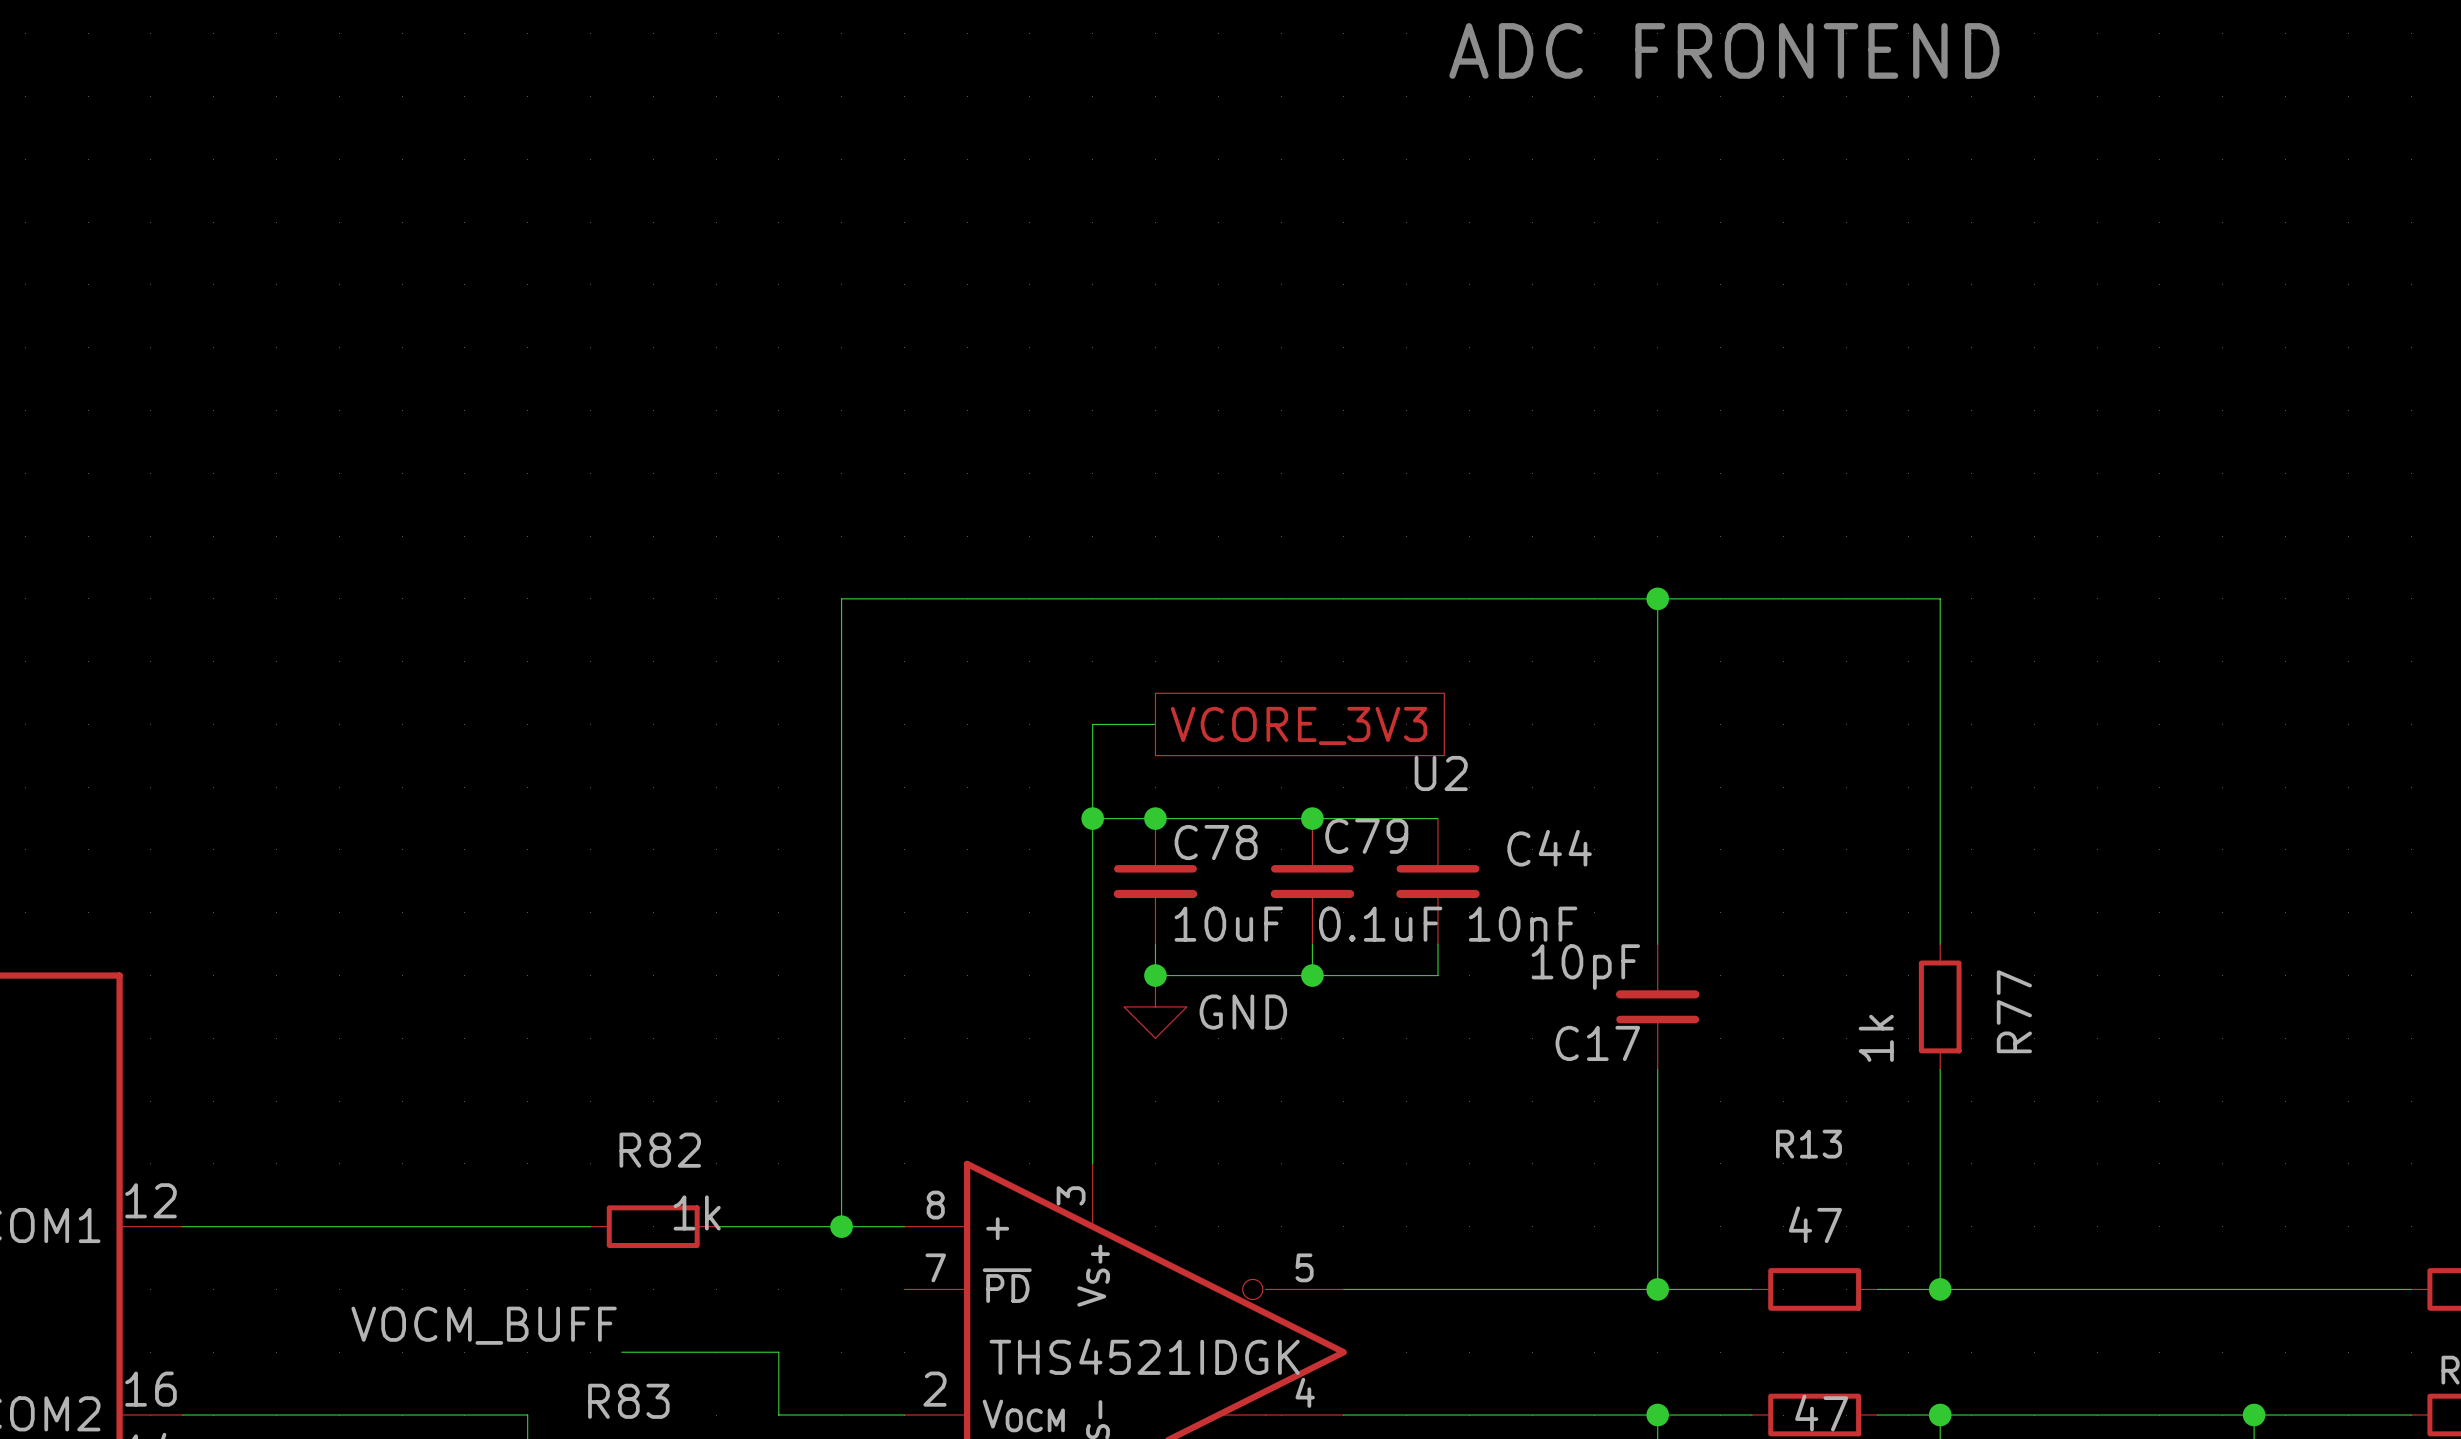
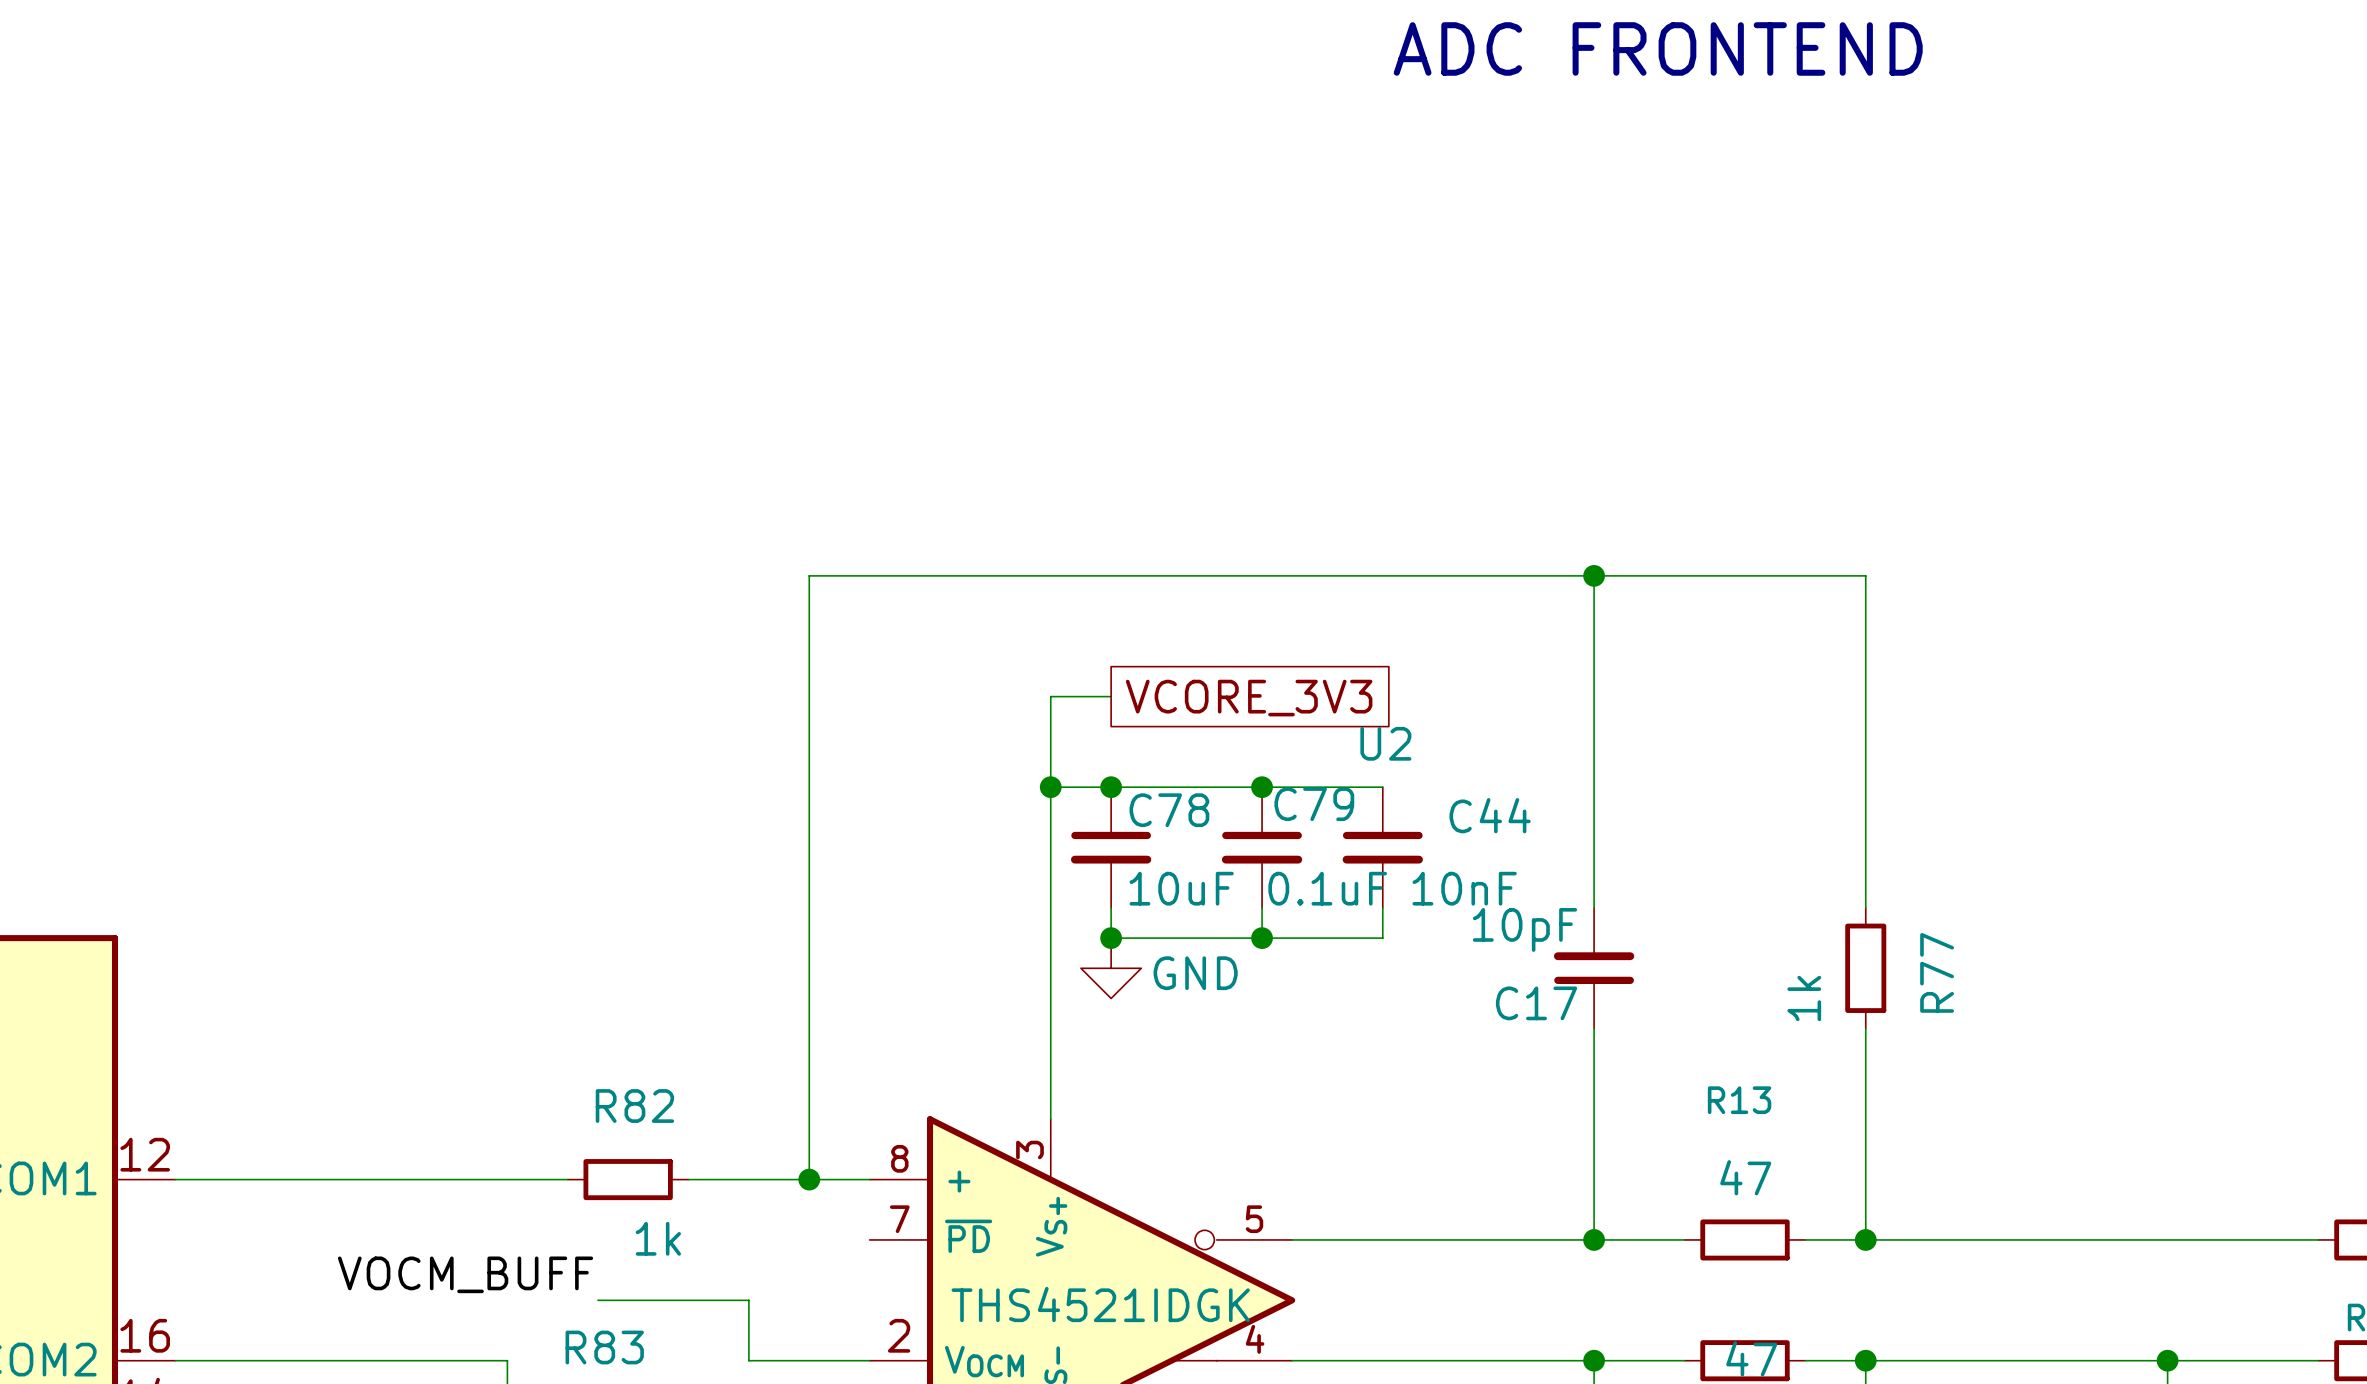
R82 value position: 1k (697, 1212) -> 1k (658, 1238)

